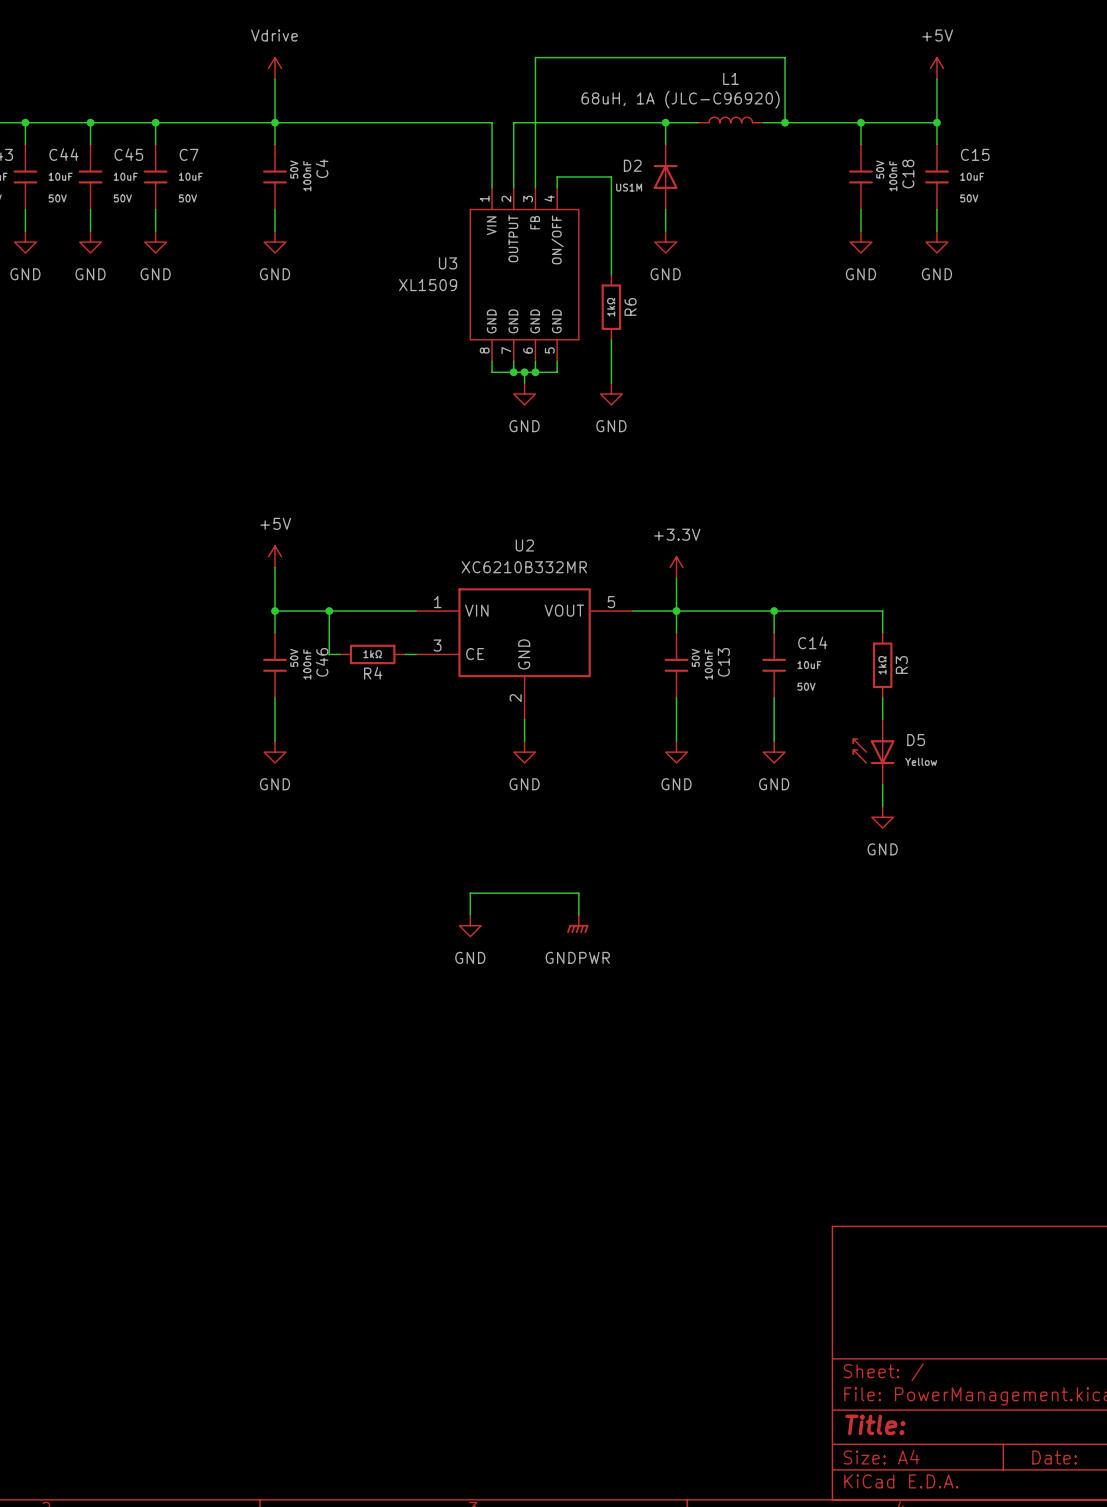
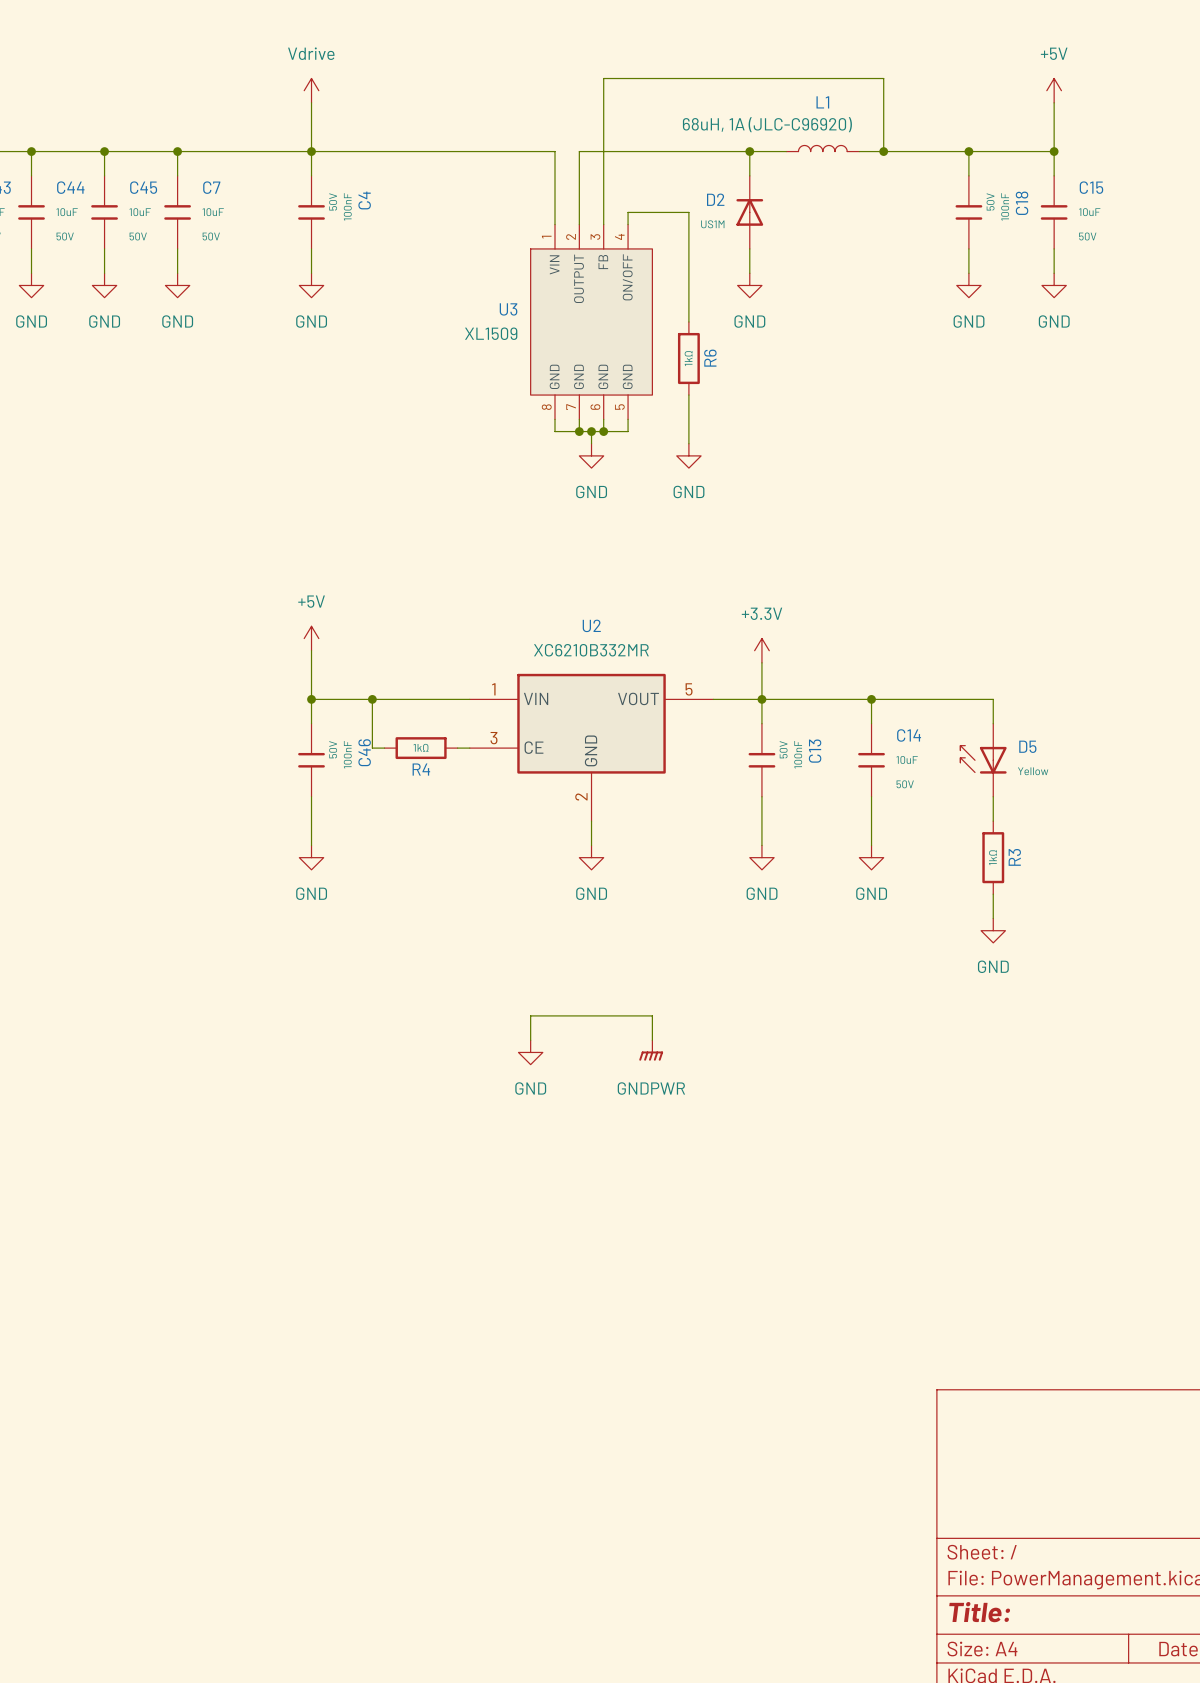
R3 position: (882, 665) -> (993, 857)
D5 position: (873, 752) -> (983, 760)

